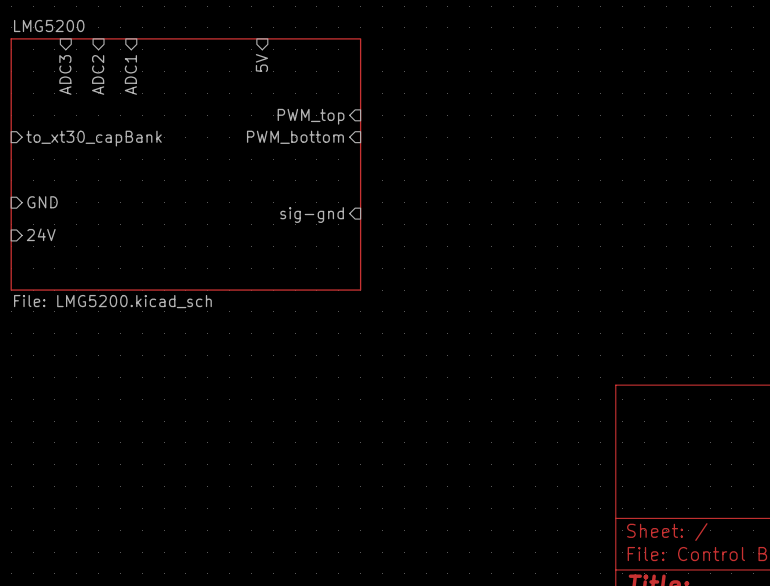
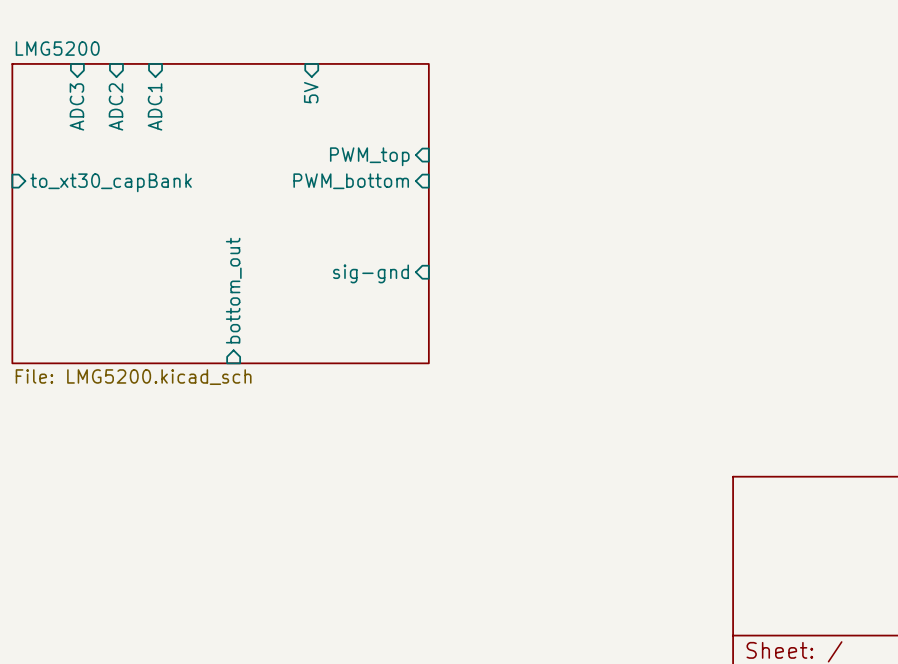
sheet pin: GND (42, 202) -> none
sheet pin: none -> bottom_out (233, 290)
sheet pin: 24V (41, 234) -> none

